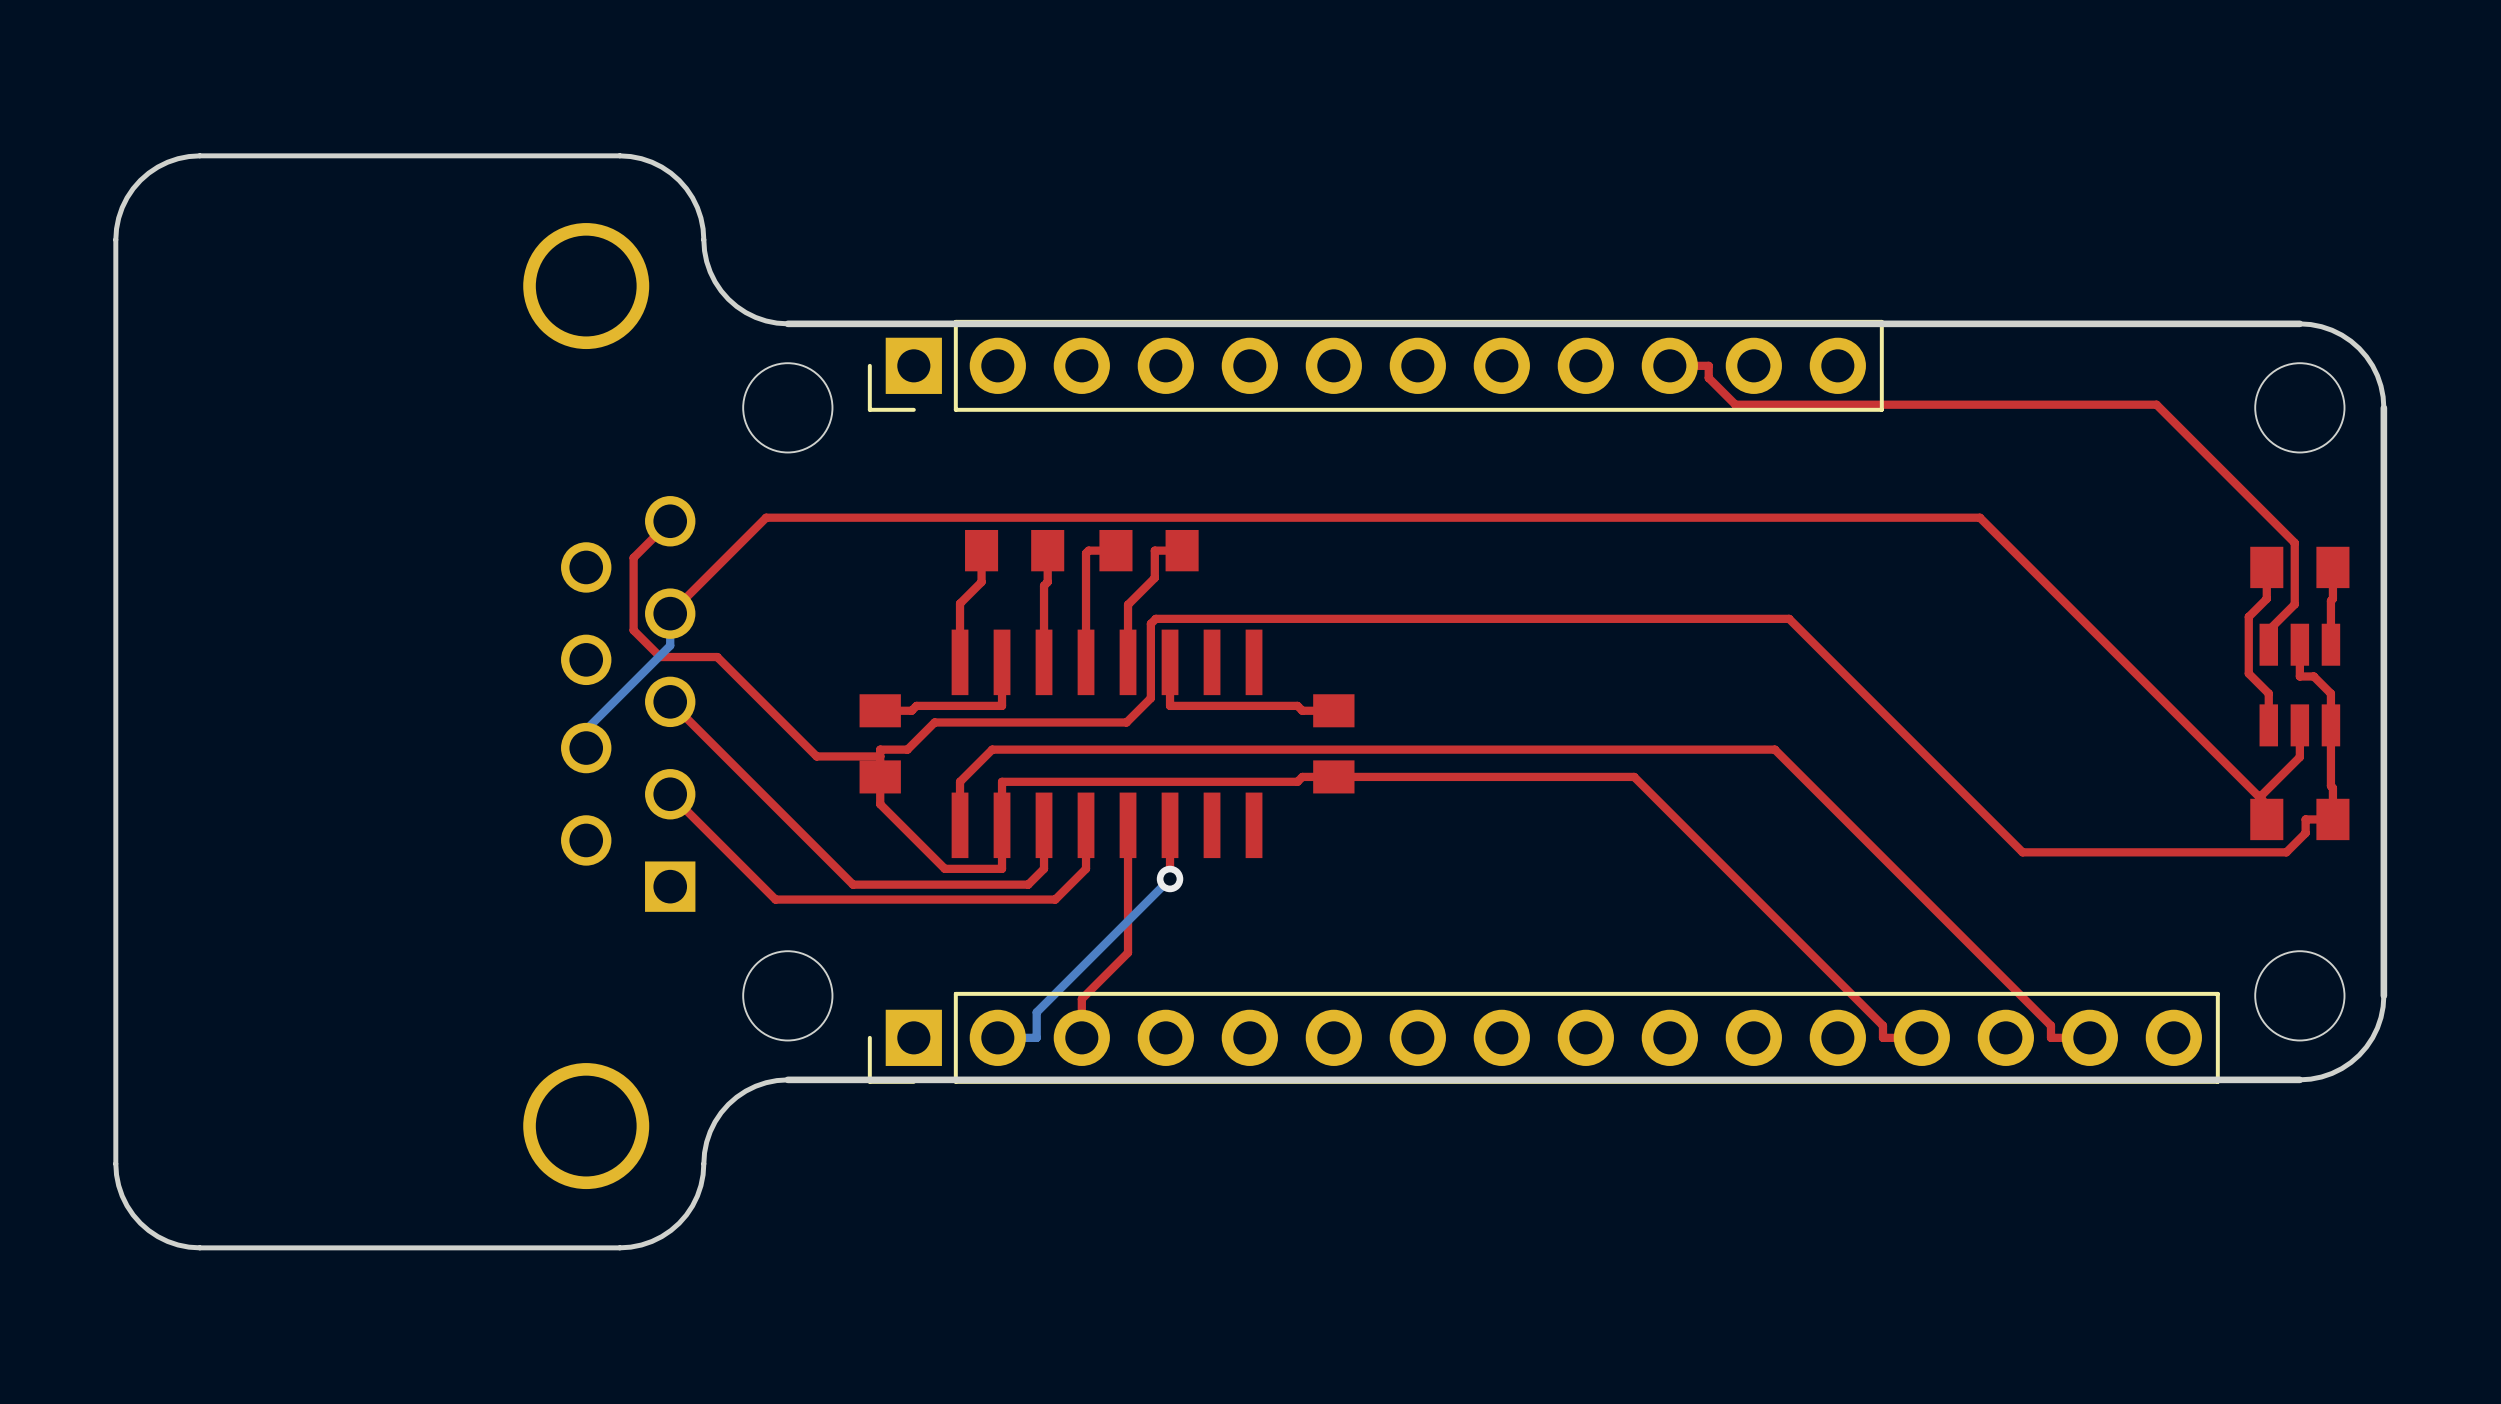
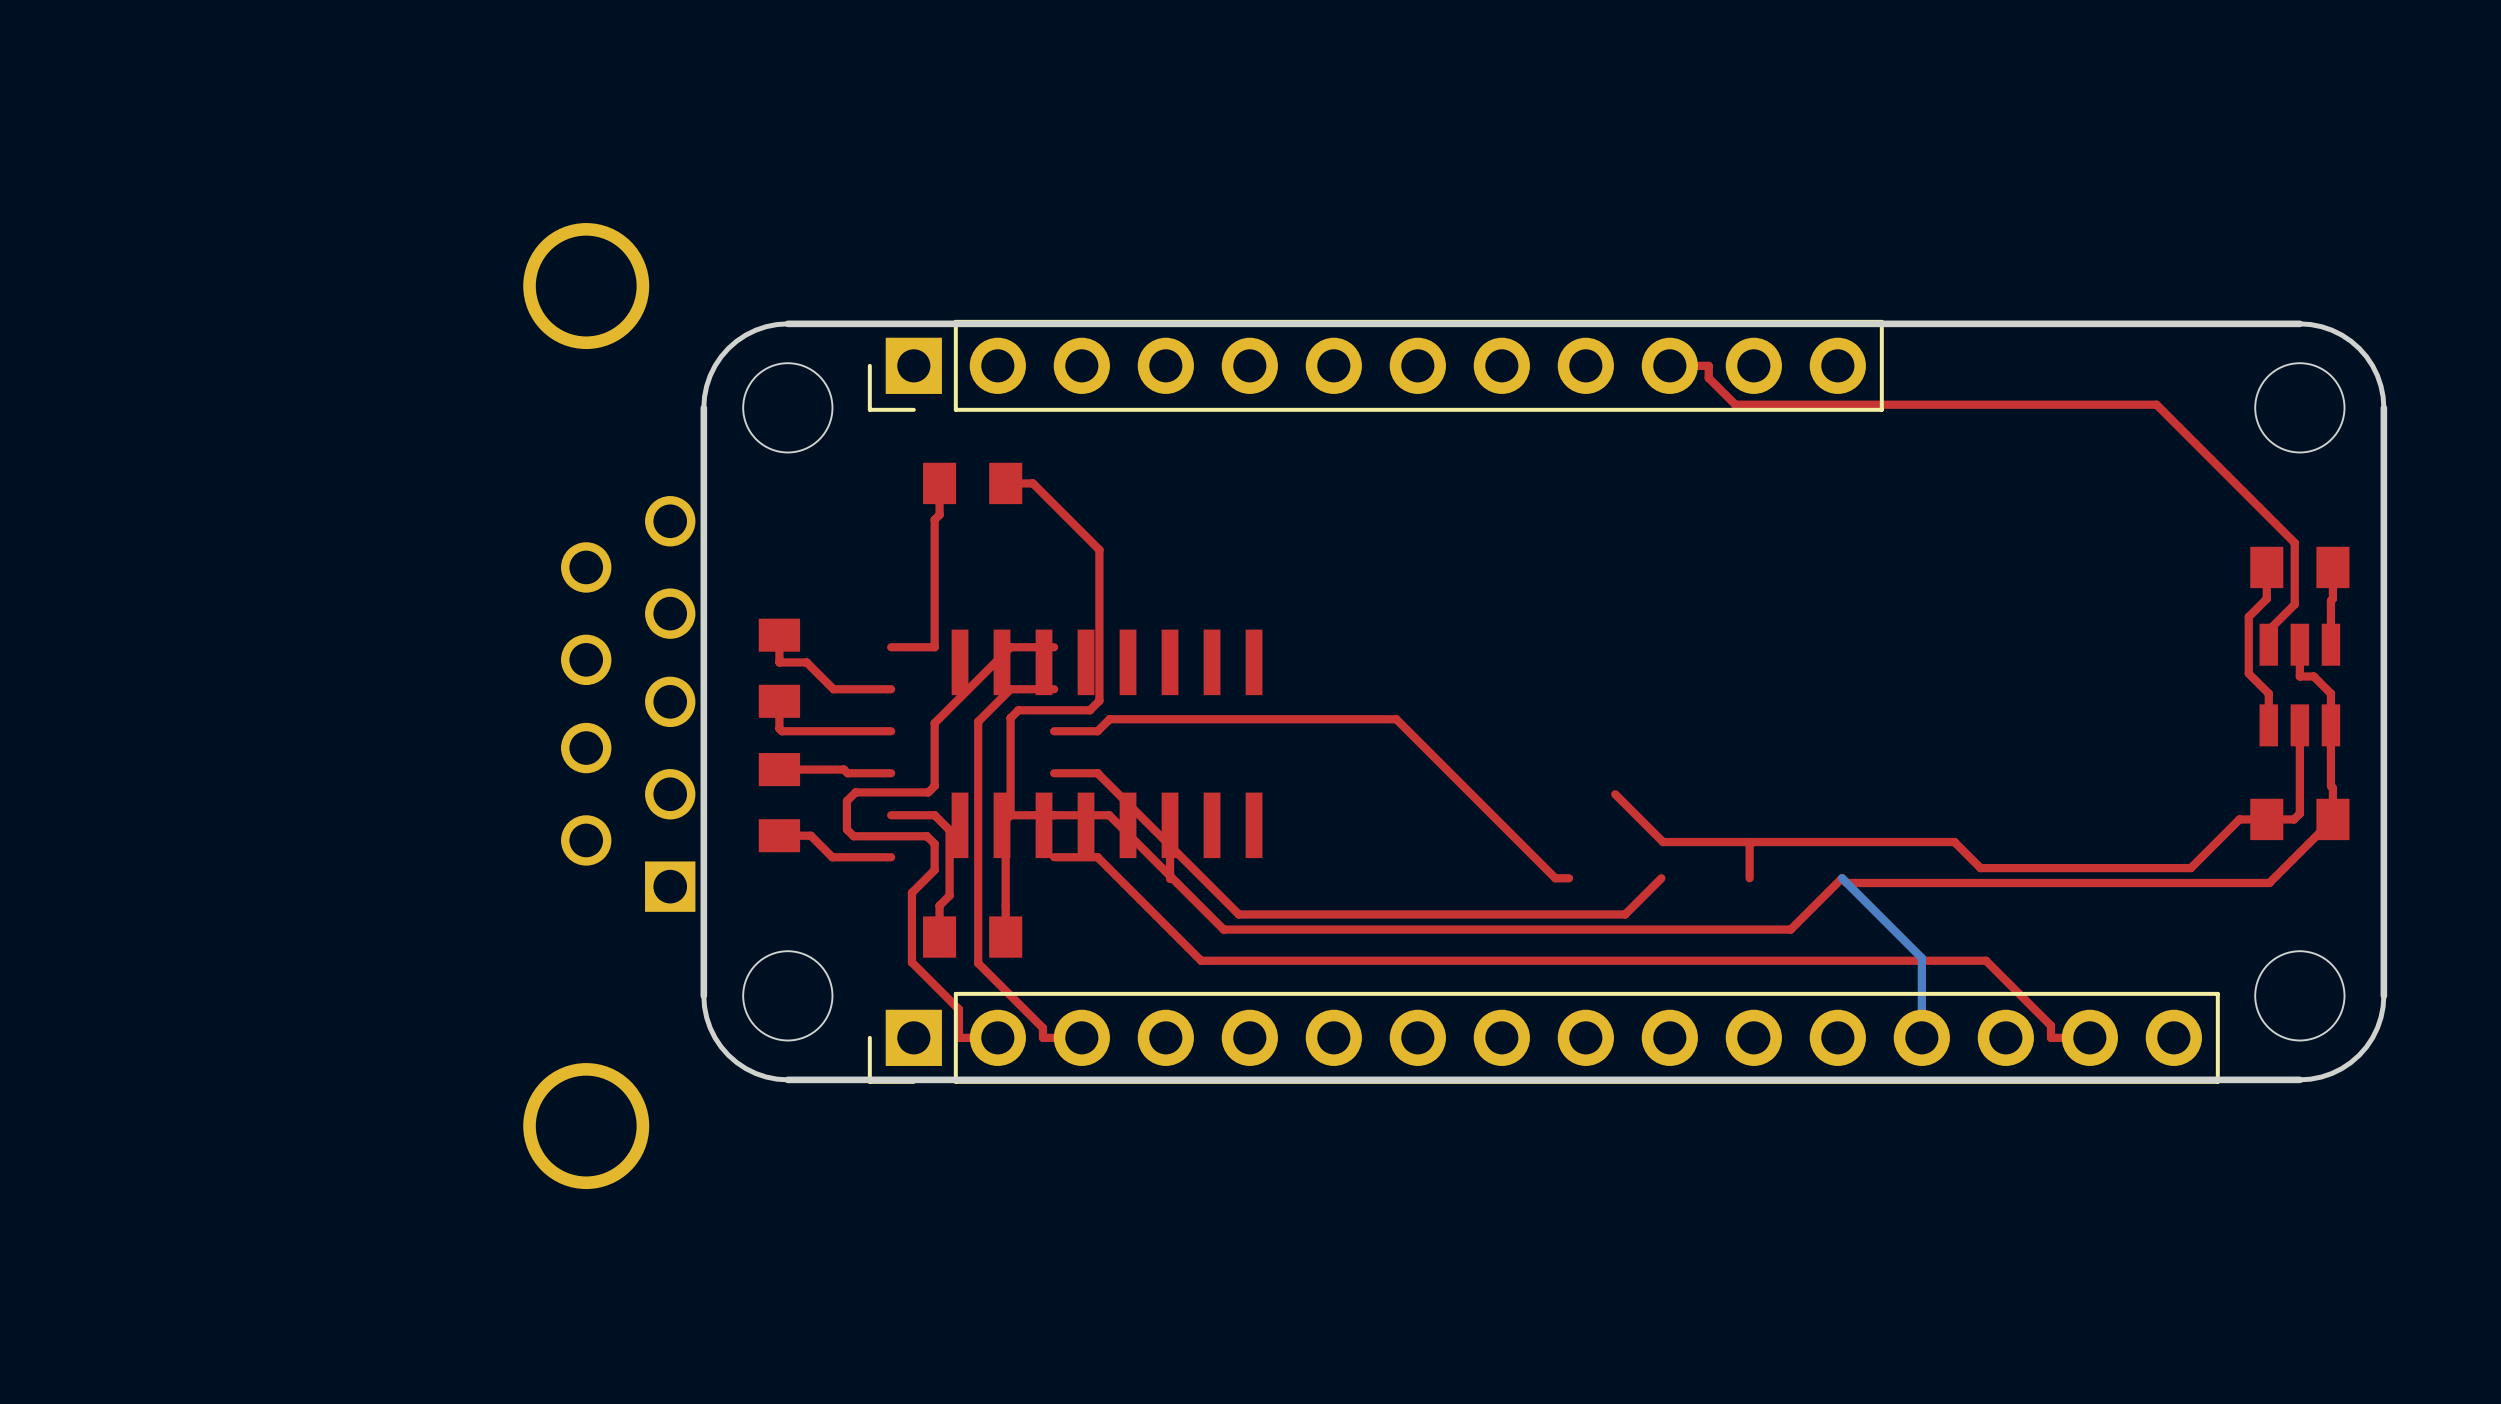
board edge: (787, 323) (755, 317) (728, 299) (710, 271) (704, 250) (700, 218) (686, 188) (661, 167) (630, 156) (188, 156) (167, 162) (140, 180) (122, 207) (116, 228) (115, 1163) (118, 1185) (133, 1214) (148, 1230) (167, 1241) (199, 1247) (619, 1247) (641, 1245) (670, 1230) (692, 1205) (700, 1185) (704, 1152) (710, 1131) (728, 1104) (755, 1086) (787, 1079) -> (787, 323) (755, 330) (728, 348) (710, 375) (703, 407) (704, 1006) (715, 1037) (728, 1055) (755, 1073) (787, 1079)
top track: none -> (939, 483) (939, 514) (934, 519) (934, 647) (891, 647)
top track: none -> (1005, 483) (1032, 483) (1099, 549) (1099, 700) (1089, 710) (1018, 710) (1010, 718) (1010, 815)
top track: (670, 521) (633, 557) (633, 630) (660, 657) (717, 657) (816, 756) (880, 756) -> none
top track: (981, 550) (981, 582) (960, 603) (960, 662) -> none
part position: (1014, 550) -> (972, 483)
top track: (1047, 550) (1047, 582) (1044, 585) (1044, 662) -> none
top track: (1115, 550) (1088, 550) (1086, 553) (1086, 662) -> none
part: (1149, 550) -> none
top track: (1182, 550) (1154, 550) (1154, 577) (1128, 604) (1128, 662) -> none
top track: (670, 613) (766, 517) (1979, 517) (2266, 804) (2266, 819) -> none
bottom track: (670, 613) (670, 645) (586, 729) (586, 748) -> none
top track: none -> (779, 635) (779, 662) (806, 662) (833, 689) (891, 689)
top track: none -> (1054, 647) (1010, 647) (934, 723) (934, 786) (928, 792) (855, 792) (846, 801) (846, 829) (853, 836) (927, 836) (934, 843) (934, 870) (911, 892) (911, 962) (958, 1009) (958, 1037) (997, 1037)
top track: (1002, 662) (1002, 705) (916, 705) (911, 710) (880, 710) -> none
top track: (1170, 662) (1170, 705) (1297, 705) (1302, 710) (1333, 710) -> none
part: none -> (779, 668)
top track: (670, 701) (853, 884) (1028, 884) (1044, 868) (1044, 825) -> none
top track: none -> (779, 701) (779, 728) (782, 731) (891, 731)
top track: none -> (1054, 731) (1097, 731) (1109, 719) (1396, 719) (1555, 878) (1569, 878)
part: (880, 743) -> none
part: (1333, 743) -> none
top track: (2299, 757) (2259, 797) -> (2299, 757) (2299, 813) (2294, 819) (2239, 819) (2190, 868) (1980, 868) (1954, 842) (1663, 842) (1615, 794)
top track: none -> (779, 769) (843, 769) (847, 773) (891, 773)
top track: none -> (1054, 773) (1097, 773) (1238, 914) (1625, 914) (1661, 878)
top track: (670, 794) (775, 899) (1055, 899) (1086, 868) (1086, 825) -> none
part: none -> (779, 802)
top track: none -> (891, 815) (934, 815) (949, 830) (949, 895) (939, 905) (939, 937)
top track: none -> (1010, 815) (1005, 820) (1005, 937)
top track: (2332, 819) (2305, 819) (2305, 833) (2286, 852) (2022, 852) (1789, 618) (1155, 618) (1150, 623) (1150, 698) (1126, 722) (934, 722) (907, 749) (880, 749) (880, 804) (944, 868) (1002, 868) (1002, 781) (1297, 781) (1302, 776) (1634, 776) (1882, 1025) (1882, 1037) (1921, 1037) -> (2332, 819) (2269, 883) (1846, 883) (1842, 878) (1790, 929) (1223, 929) (1109, 815) (1010, 815)
top track: (960, 825) (960, 781) (992, 749) (1774, 749) (1986, 960) -> (1054, 857) (1097, 857) (1201, 960) (1986, 960)
top track: (1128, 825) (1128, 952) (1081, 998) (1081, 1037) -> (1054, 689) (1010, 689) (978, 721) (978, 963) (1042, 1028) (1042, 1037) (1081, 1037)
top track: none -> (779, 835) (810, 835) (832, 857) (891, 857)
top track: none -> (1749, 842) (1749, 878)
bottom track: (1170, 878) (1036, 1012) (1036, 1037) (997, 1037) -> none
via: (1170, 878) -> none
bottom track: none -> (1842, 878) (1921, 958) (1921, 1037)
part: none -> (972, 937)

